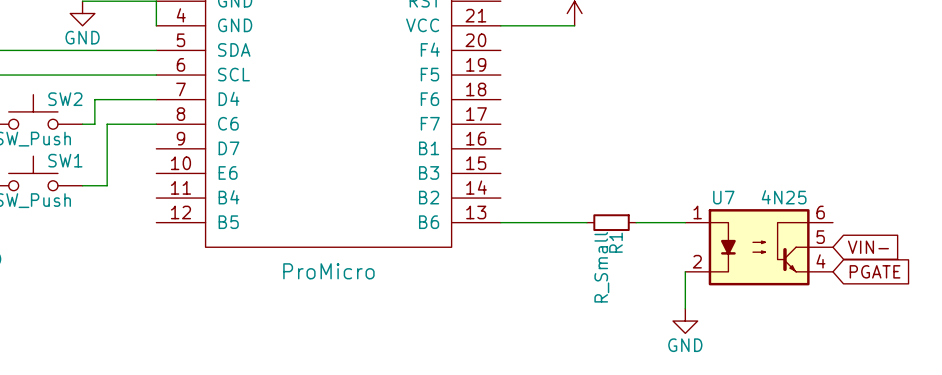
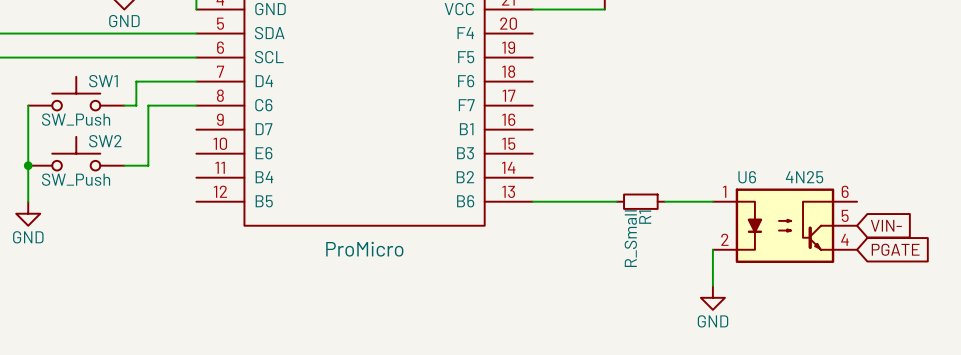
SW2 name: SW2 (65, 99) -> SW1 (103, 81)
SW1 name: SW1 (65, 160) -> SW2 (105, 141)
U7 name: U7 (723, 197) -> U6 (747, 177)

